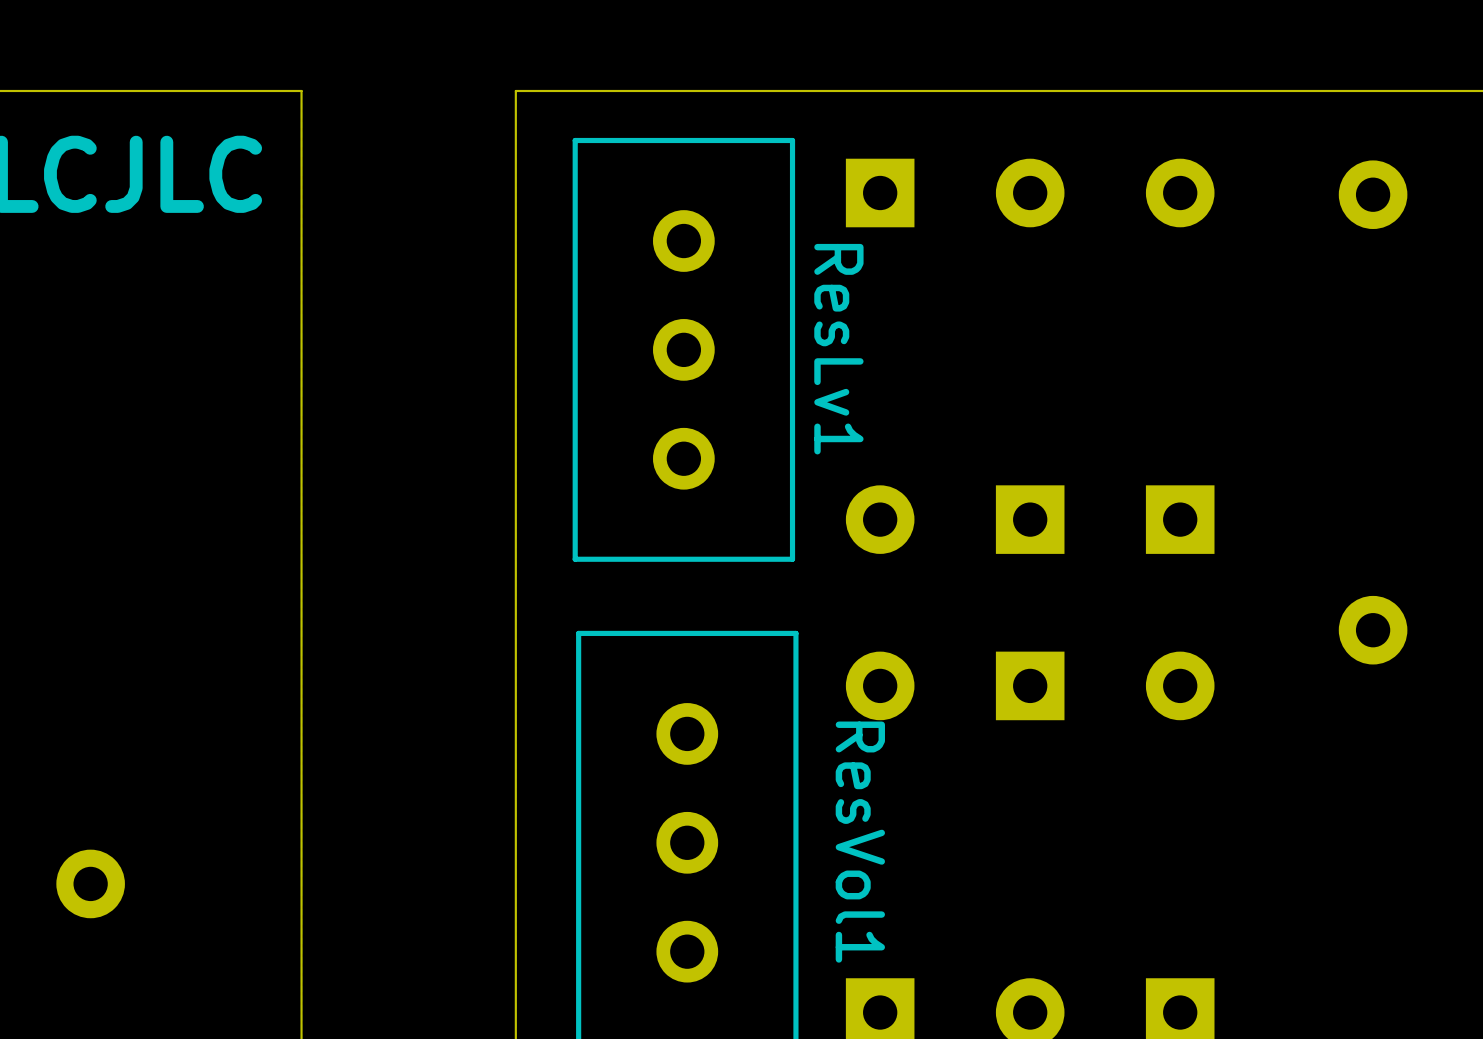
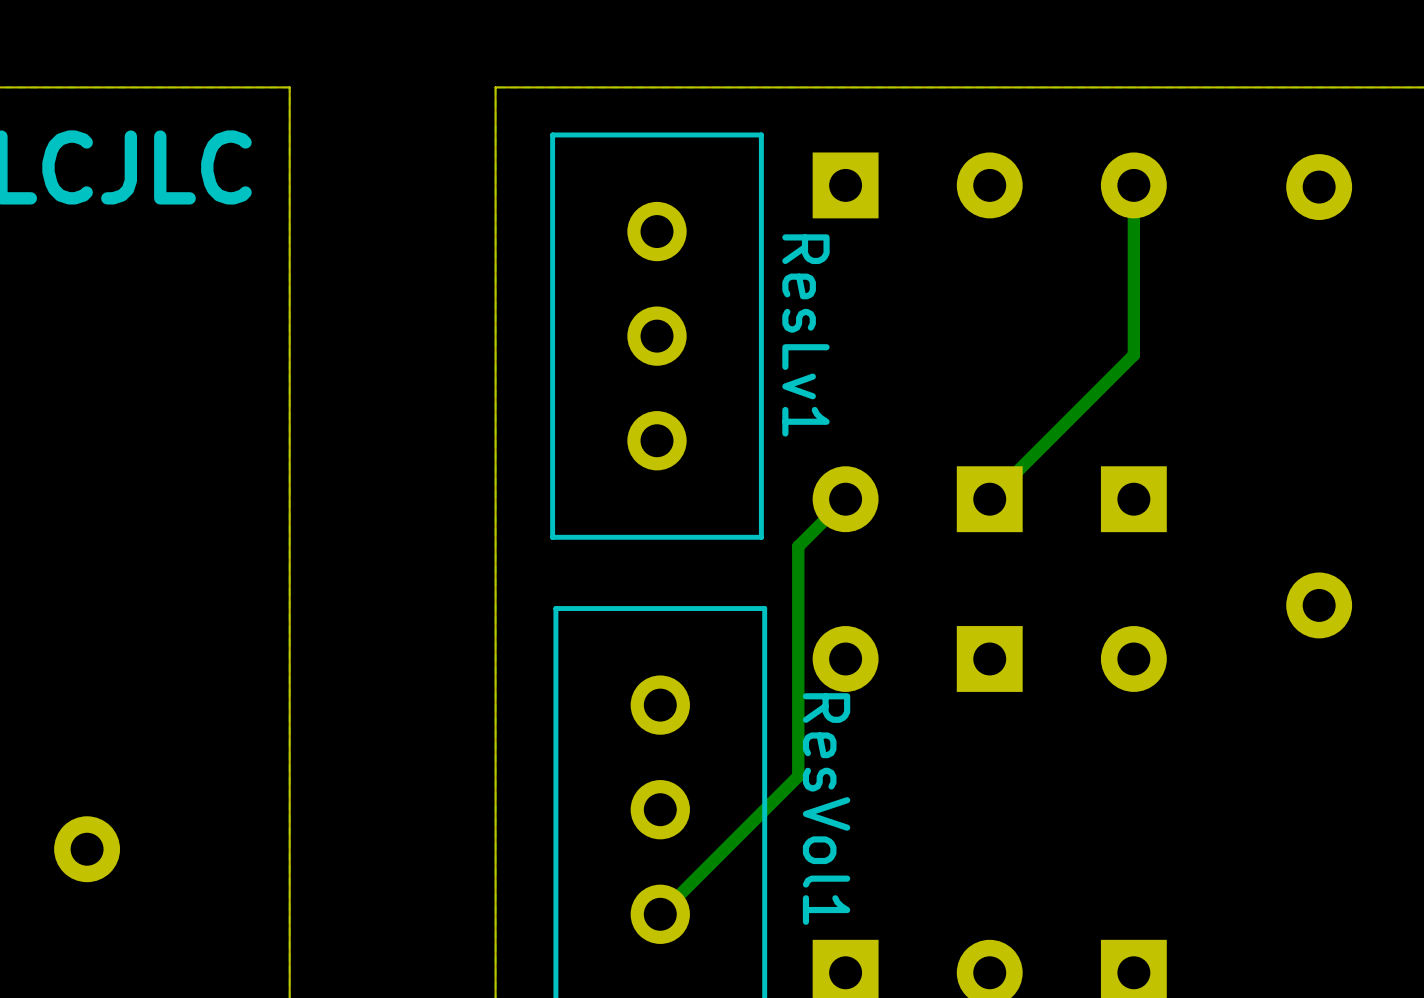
track: none -> (1133, 185) (1133, 355) (989, 499)
track: none -> (845, 499) (798, 546) (798, 776) (660, 914)

